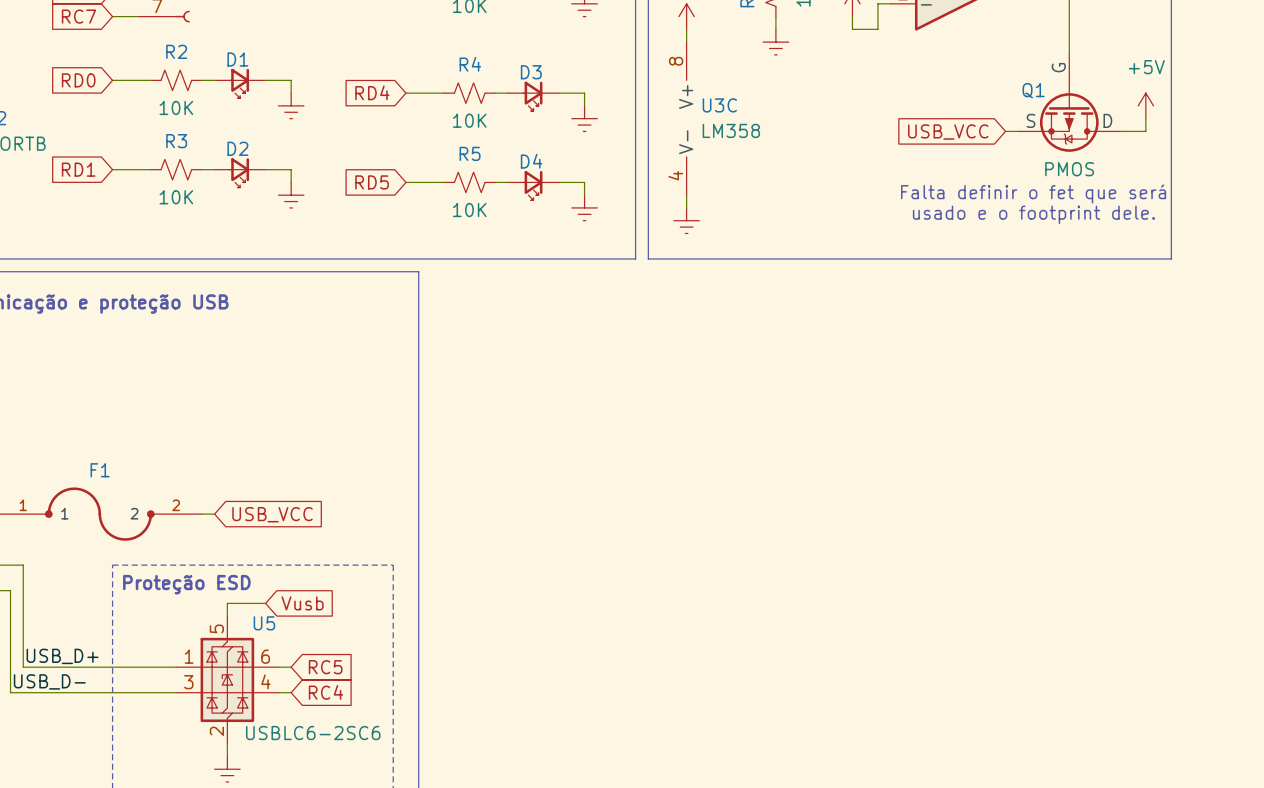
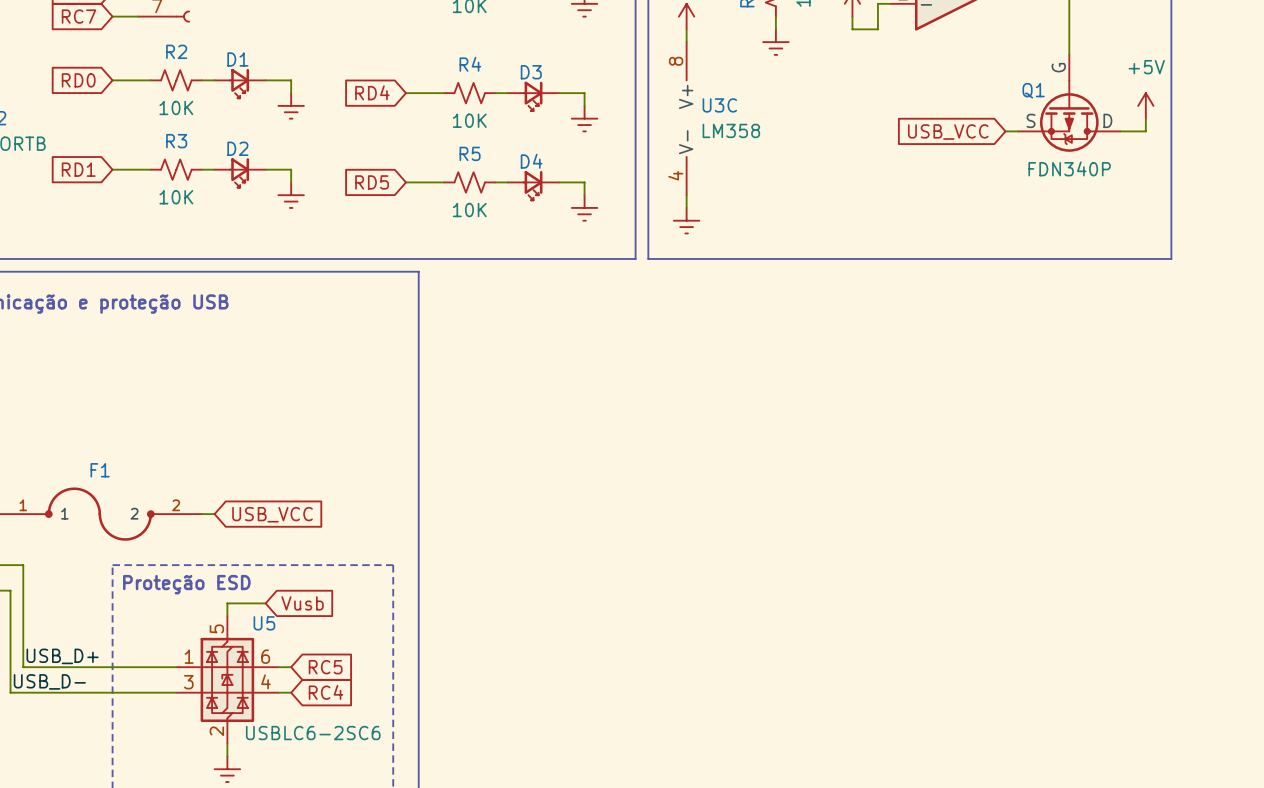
Q1 value: PMOS (1069, 169) -> FDN340P (1069, 168)
text: Falta definir o fet que será (1033, 193) -> none
text: usado e o footprint dele. (1033, 214) -> none

